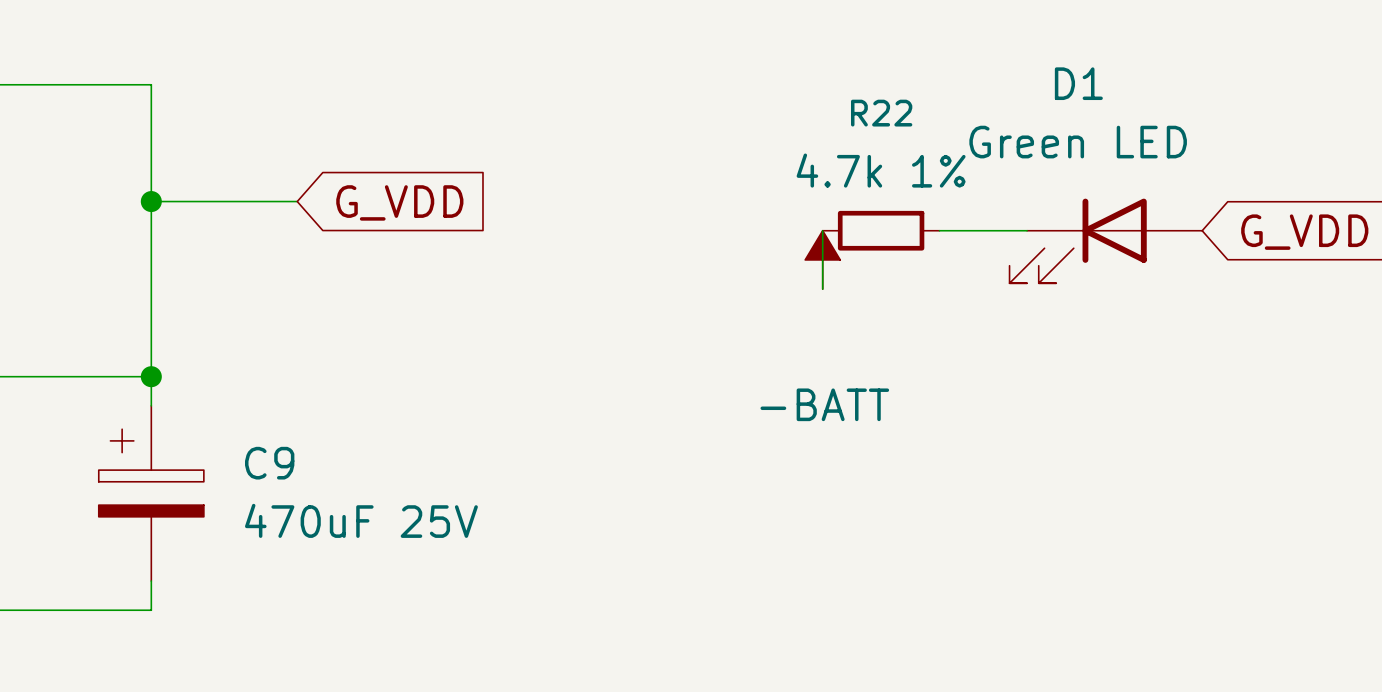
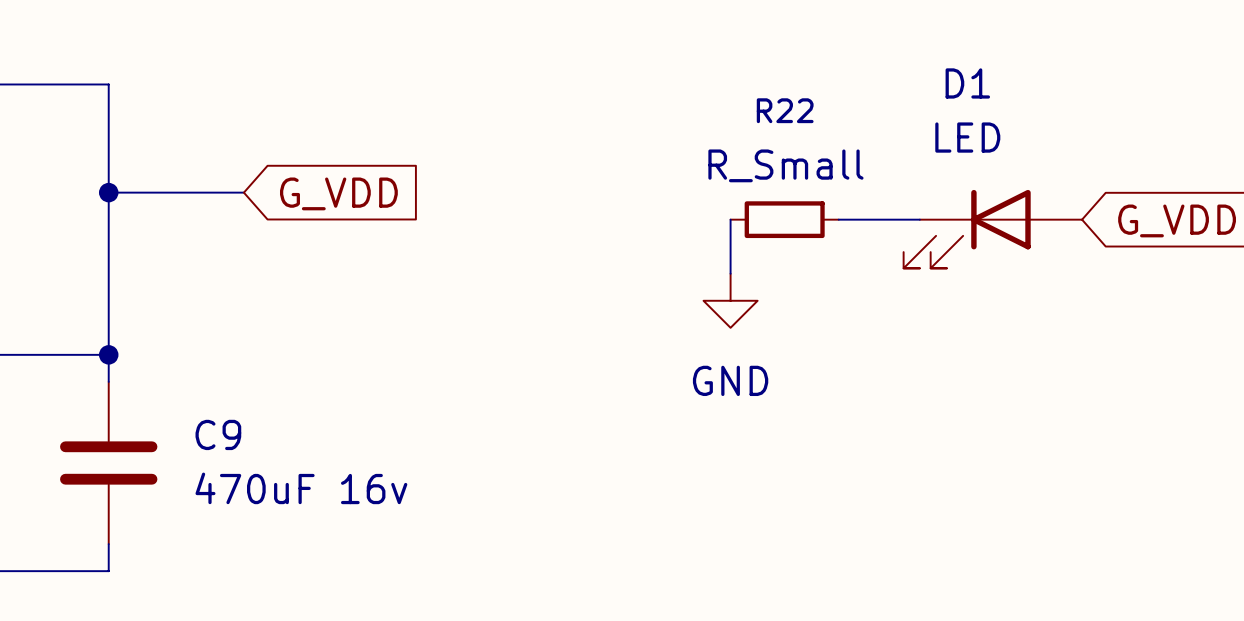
D1 value: Green LED (1078, 142) -> LED (967, 137)
R22 value: 4.7k 1% (881, 170) -> R_Small (785, 165)
power symbol: -BATT (822, 259) -> none
power symbol: none -> GND (730, 300)
C9 symbol: [98, 405, 204, 582] -> [60, 381, 158, 545]
C9 value: 470uF 25V (361, 520) -> 470uF 16v (301, 488)

